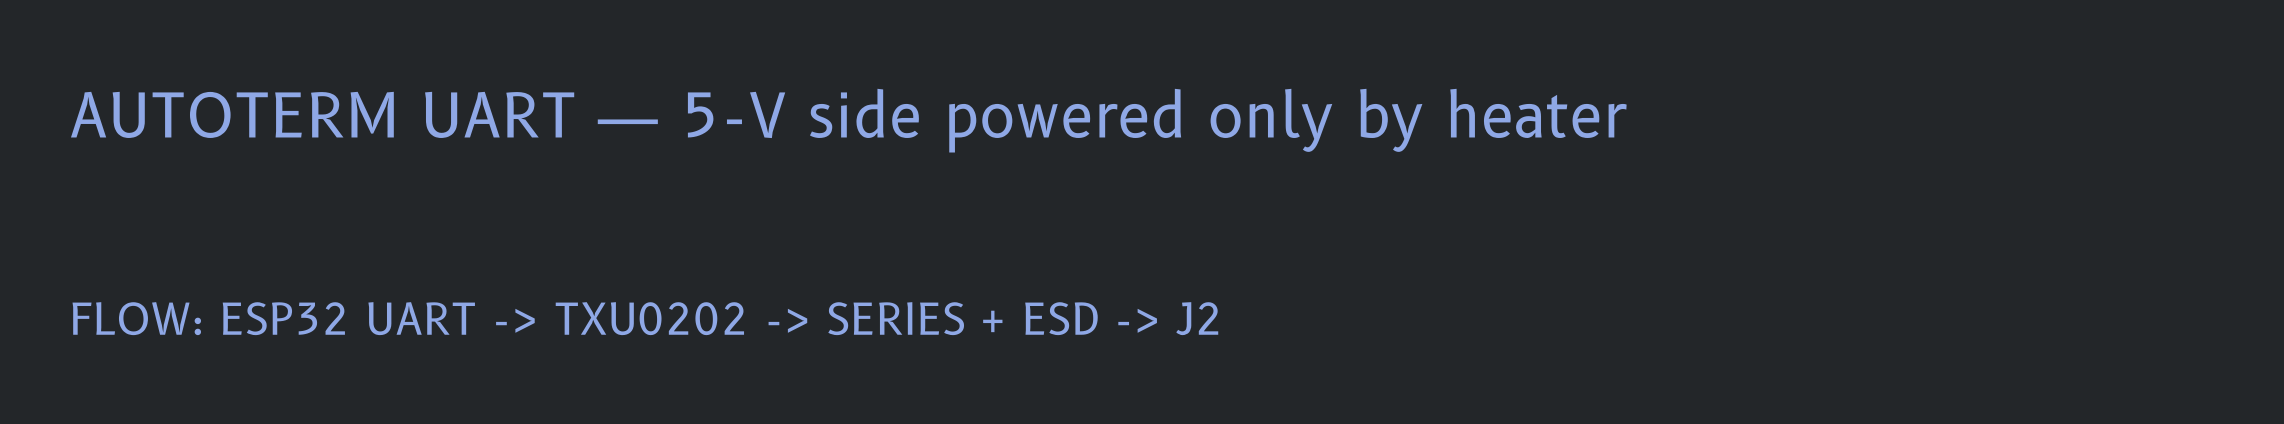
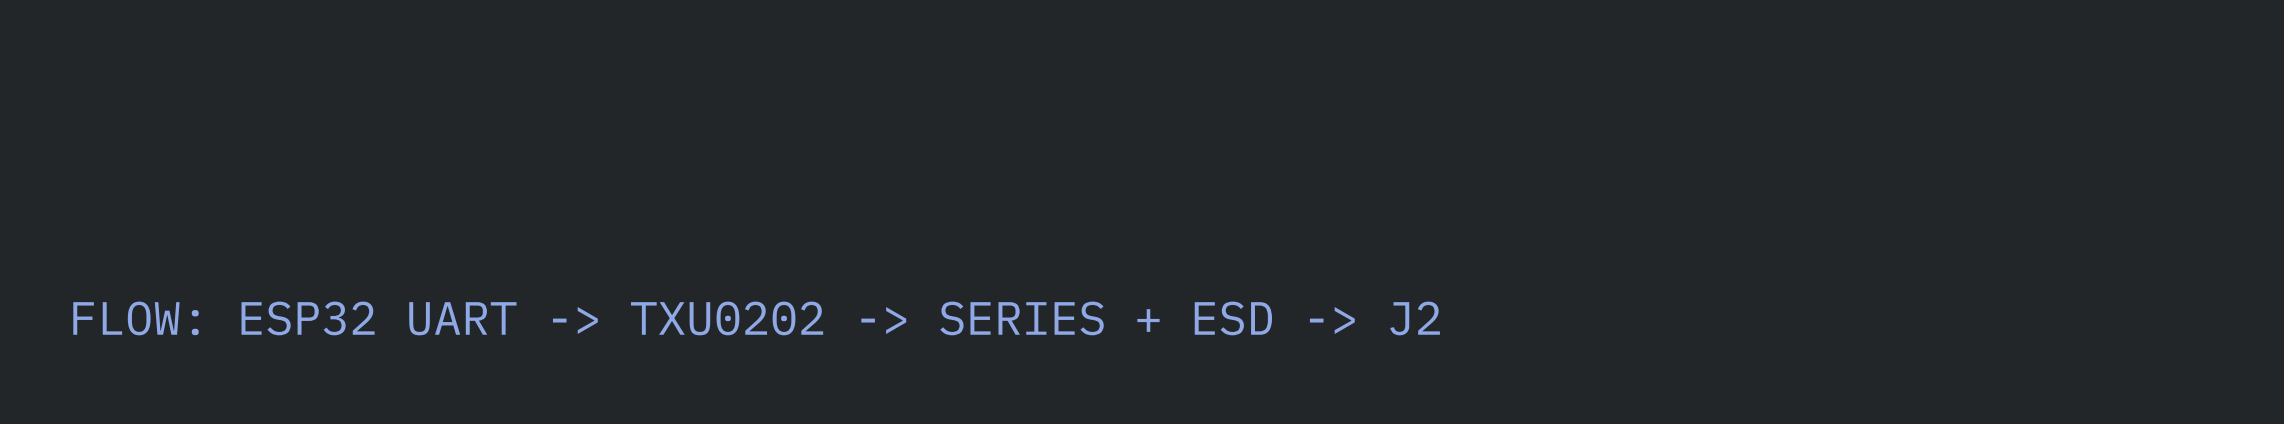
text: AUTOTERM UART — 5-V side powered only by heater (848, 120) -> none

